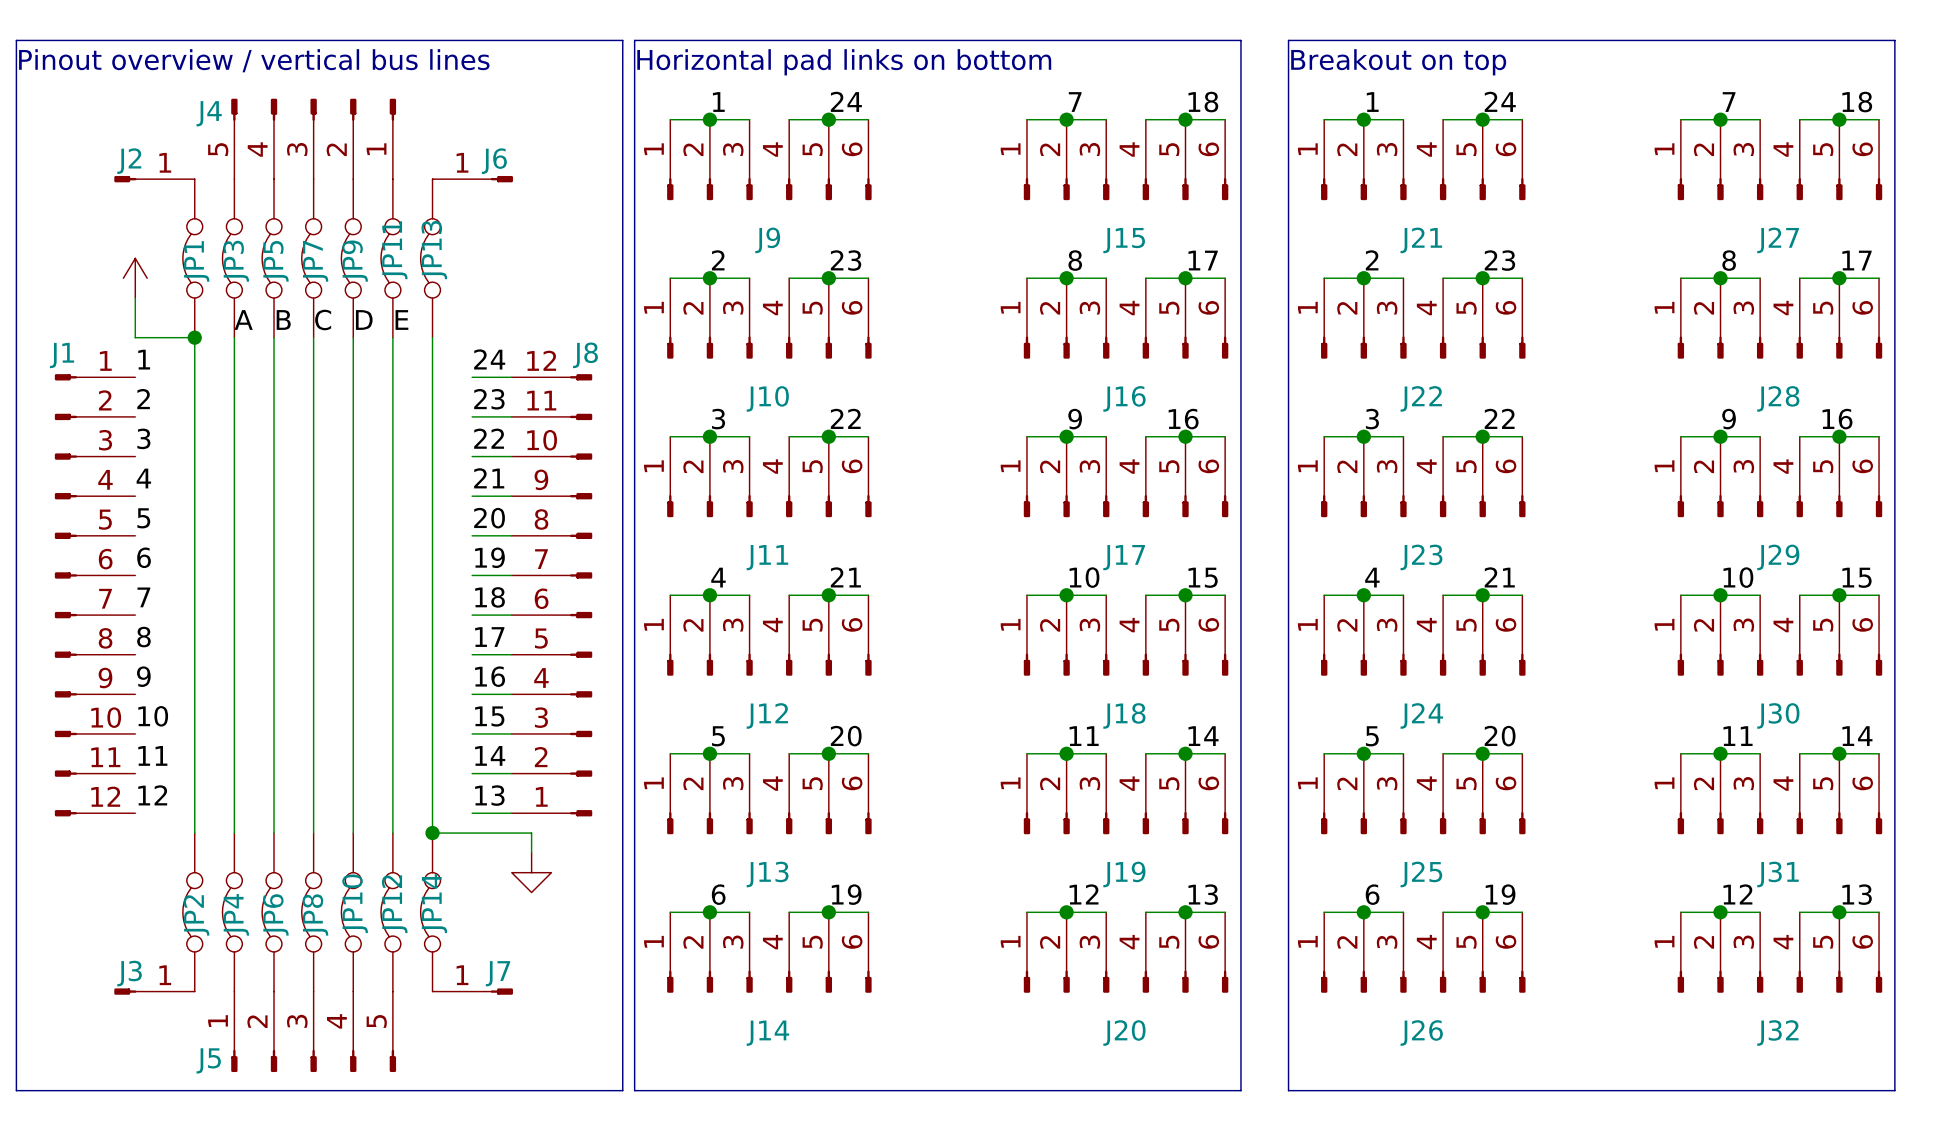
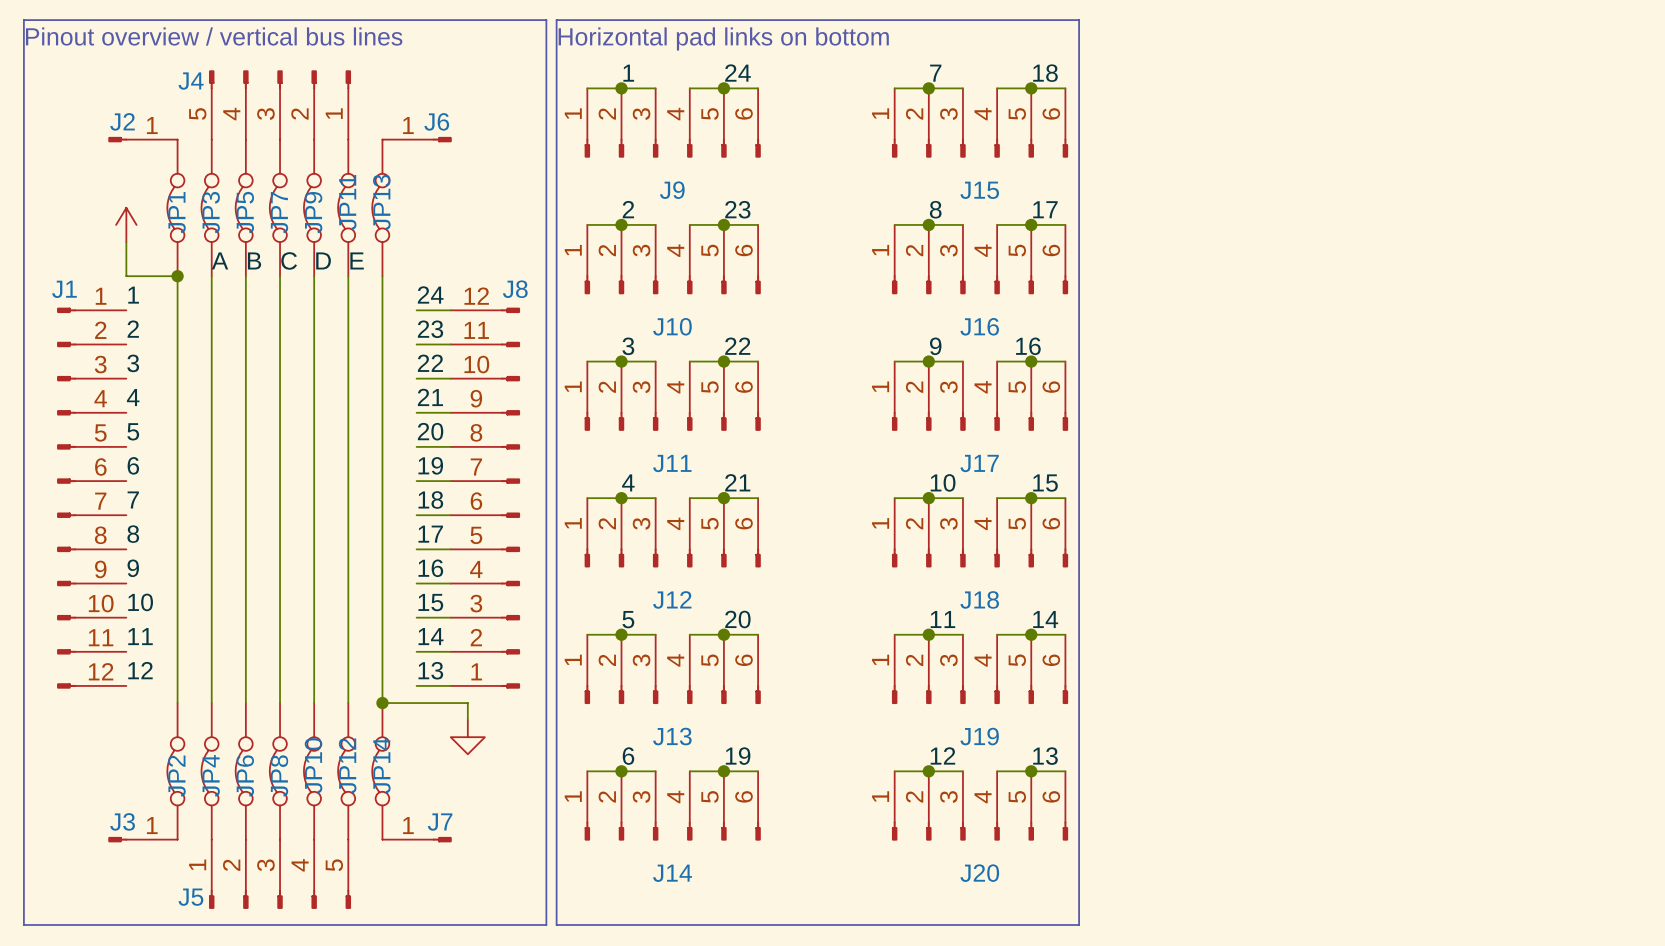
line: (1288, 40) (1288, 1090) (1894, 1090) (1894, 40) (1288, 40) -> none
text: Breakout on top (1398, 62) -> none
label: 24 (1500, 101) -> none
label: 1 (1372, 102) -> none
label: 7 (1729, 102) -> none
label: 18 (1857, 102) -> none
wire: (1324, 119) (1403, 119) -> none
junction: (1363, 119) -> none
wire: (1443, 119) (1522, 119) -> none
junction: (1482, 119) -> none
wire: (1680, 119) (1760, 119) -> none
junction: (1720, 119) -> none
wire: (1799, 119) (1879, 119) -> none
junction: (1839, 119) -> none
J21: (1423, 159) -> none
J27: (1779, 159) -> none
label: 2 (1372, 260) -> none
label: 23 (1499, 260) -> none
label: 8 (1729, 260) -> none
label: 17 (1857, 260) -> none
wire: (1324, 278) (1403, 278) -> none
junction: (1363, 278) -> none
wire: (1443, 278) (1522, 278) -> none
junction: (1482, 278) -> none
wire: (1680, 278) (1760, 278) -> none
junction: (1720, 278) -> none
wire: (1799, 278) (1879, 278) -> none
junction: (1839, 278) -> none
J22: (1423, 318) -> none
J28: (1779, 318) -> none
label: 22 (1499, 418) -> none
label: 3 (1372, 419) -> none
label: 9 (1729, 419) -> none
label: 16 (1837, 419) -> none
wire: (1324, 436) (1403, 436) -> none
junction: (1363, 436) -> none
wire: (1443, 436) (1522, 436) -> none
junction: (1482, 436) -> none
wire: (1680, 436) (1760, 436) -> none
junction: (1720, 436) -> none
wire: (1799, 436) (1879, 436) -> none
junction: (1839, 436) -> none
J23: (1423, 476) -> none
J29: (1779, 476) -> none
label: 4 (1372, 577) -> none
label: 21 (1499, 577) -> none
label: 10 (1738, 577) -> none
label: 15 (1856, 577) -> none
wire: (1324, 595) (1403, 595) -> none
junction: (1363, 595) -> none
wire: (1443, 595) (1522, 595) -> none
junction: (1482, 595) -> none
wire: (1680, 595) (1760, 595) -> none
junction: (1720, 595) -> none
wire: (1799, 595) (1879, 595) -> none
junction: (1839, 595) -> none
J24: (1423, 635) -> none
J30: (1779, 635) -> none
label: 5 (1372, 736) -> none
label: 20 (1500, 736) -> none
label: 11 (1738, 736) -> none
label: 14 (1857, 736) -> none
wire: (1324, 753) (1403, 753) -> none
junction: (1363, 753) -> none
wire: (1443, 753) (1522, 753) -> none
junction: (1482, 753) -> none
wire: (1680, 753) (1760, 753) -> none
junction: (1720, 753) -> none
wire: (1799, 753) (1879, 753) -> none
junction: (1839, 753) -> none
J25: (1423, 794) -> none
J31: (1779, 794) -> none
label: 6 (1372, 894) -> none
label: 19 (1500, 894) -> none
label: 12 (1737, 894) -> none
label: 13 (1857, 894) -> none
wire: (1324, 912) (1403, 912) -> none
junction: (1363, 912) -> none
wire: (1443, 912) (1522, 912) -> none
junction: (1482, 912) -> none
wire: (1680, 912) (1760, 912) -> none
junction: (1720, 912) -> none
wire: (1799, 912) (1879, 912) -> none
junction: (1839, 912) -> none
J26: (1423, 952) -> none
J32: (1779, 952) -> none

